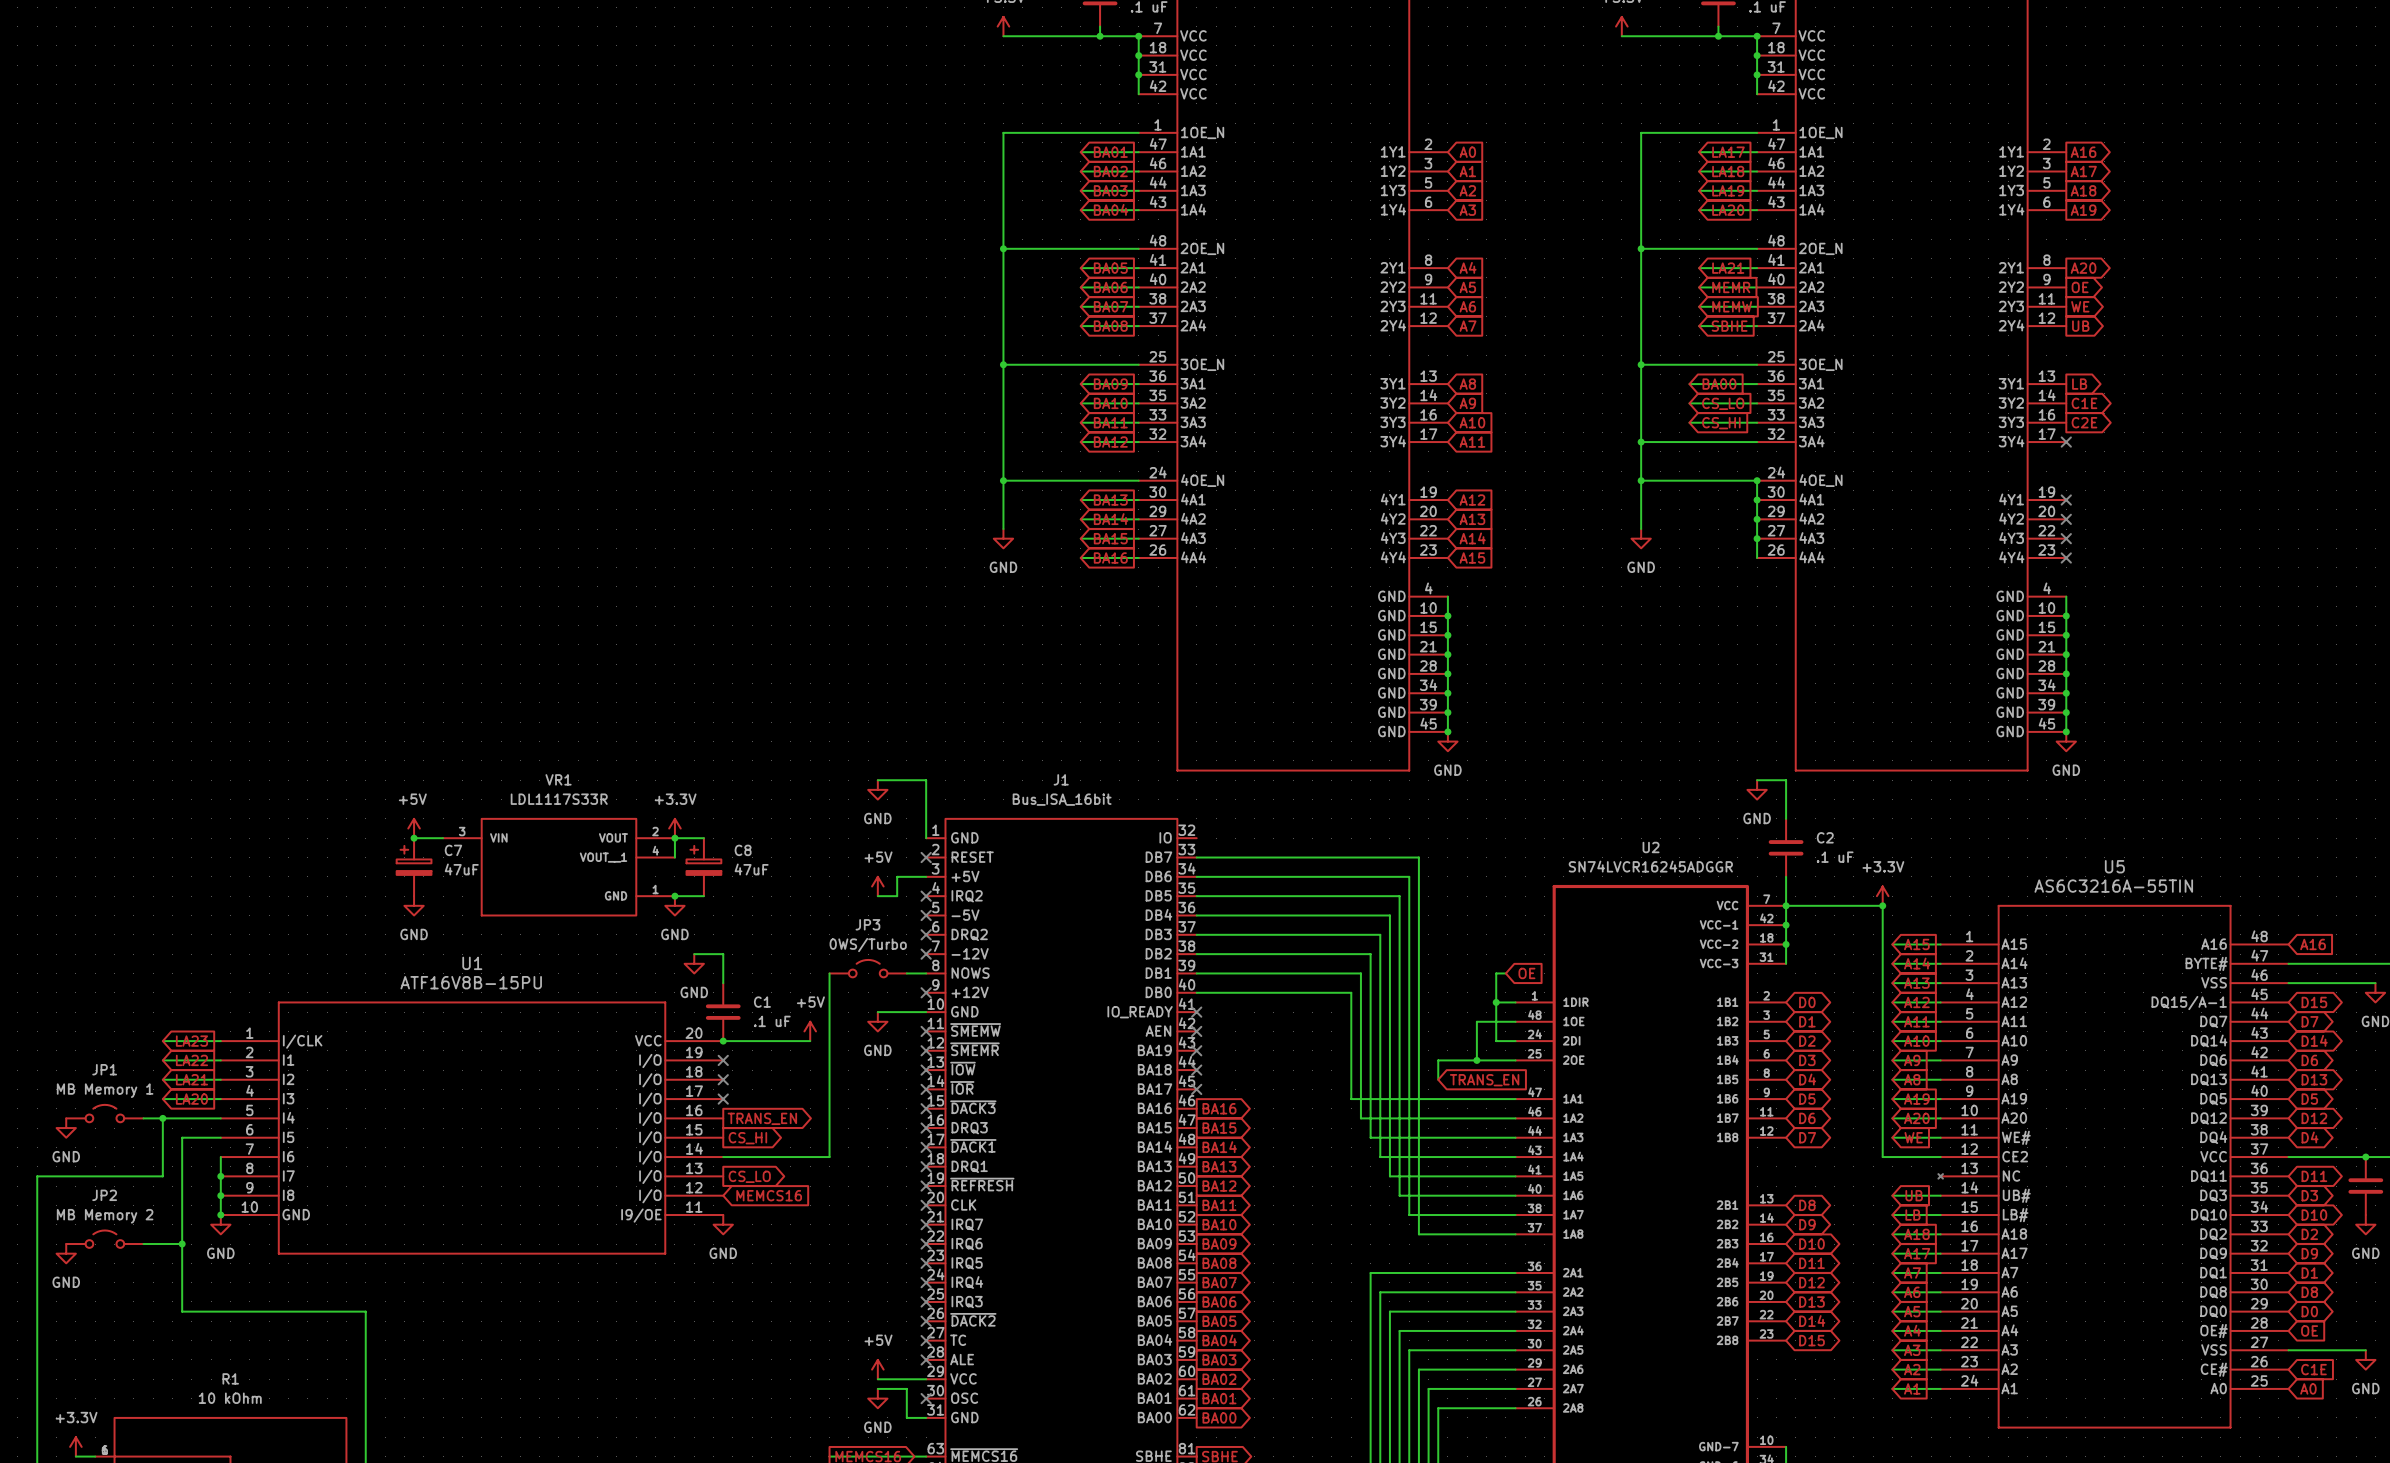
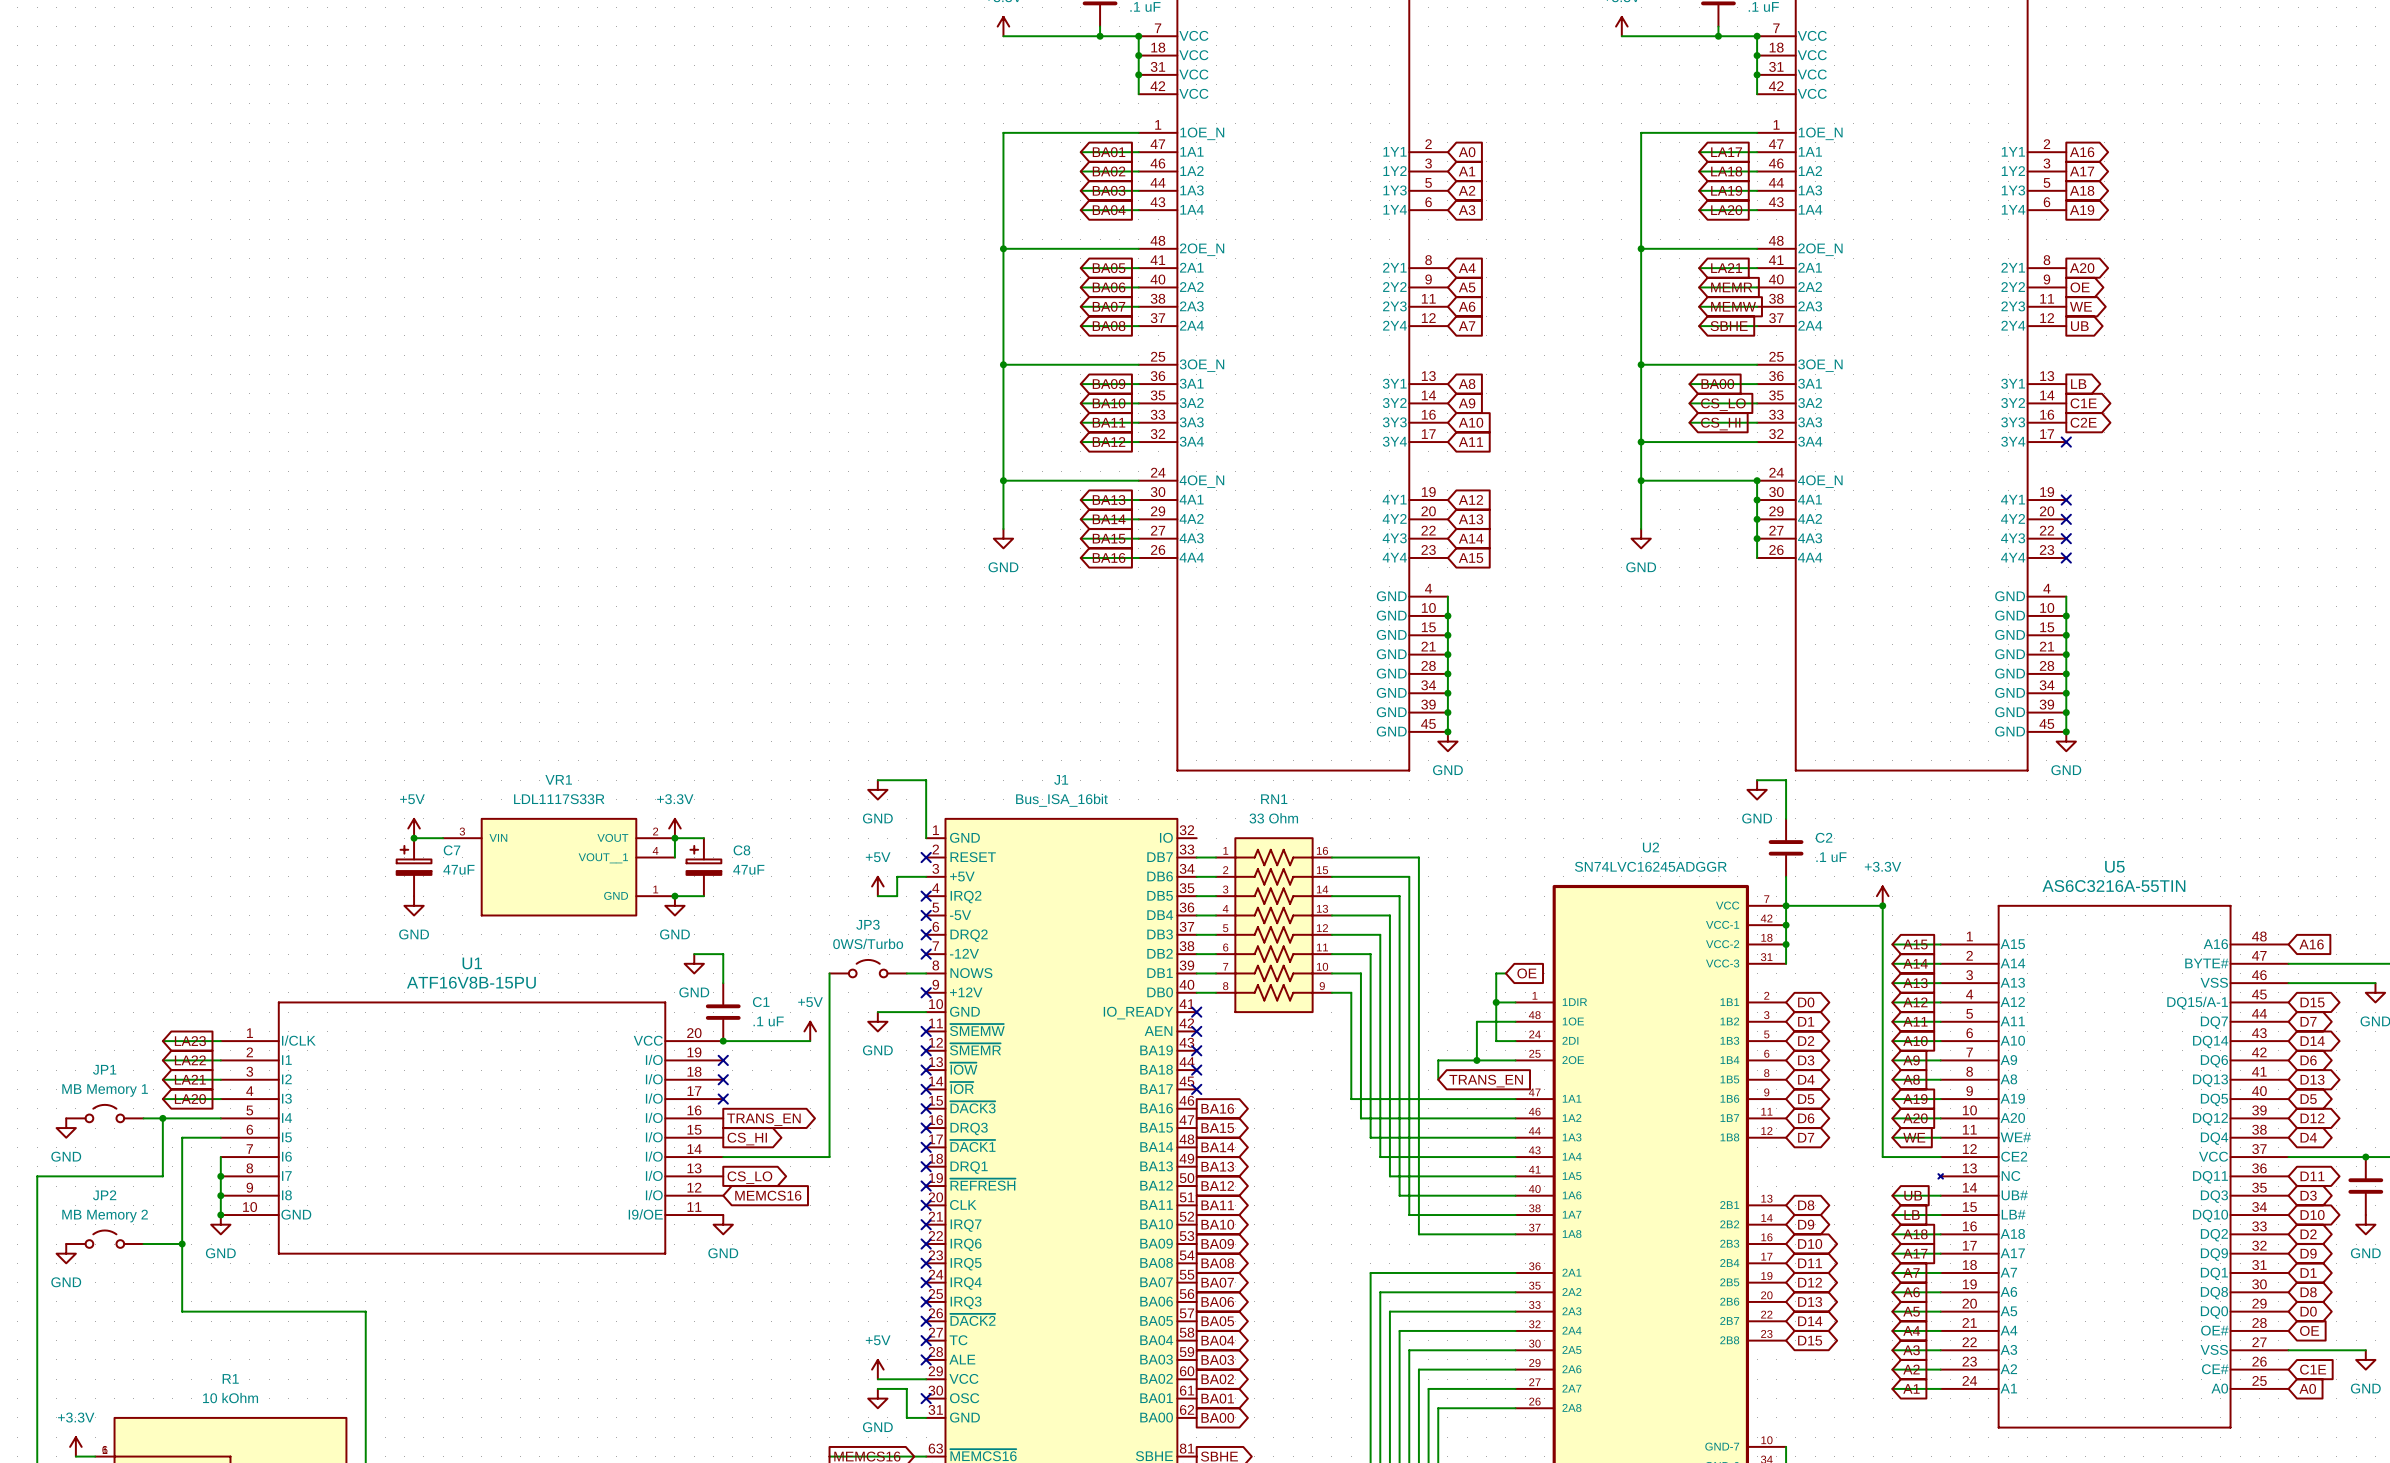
U2 value: SN74LVCR16245ADGGR (1650, 866) -> SN74LVC16245ADGGR (1650, 866)
RN1: none -> 33 Ohm (1273, 925)

